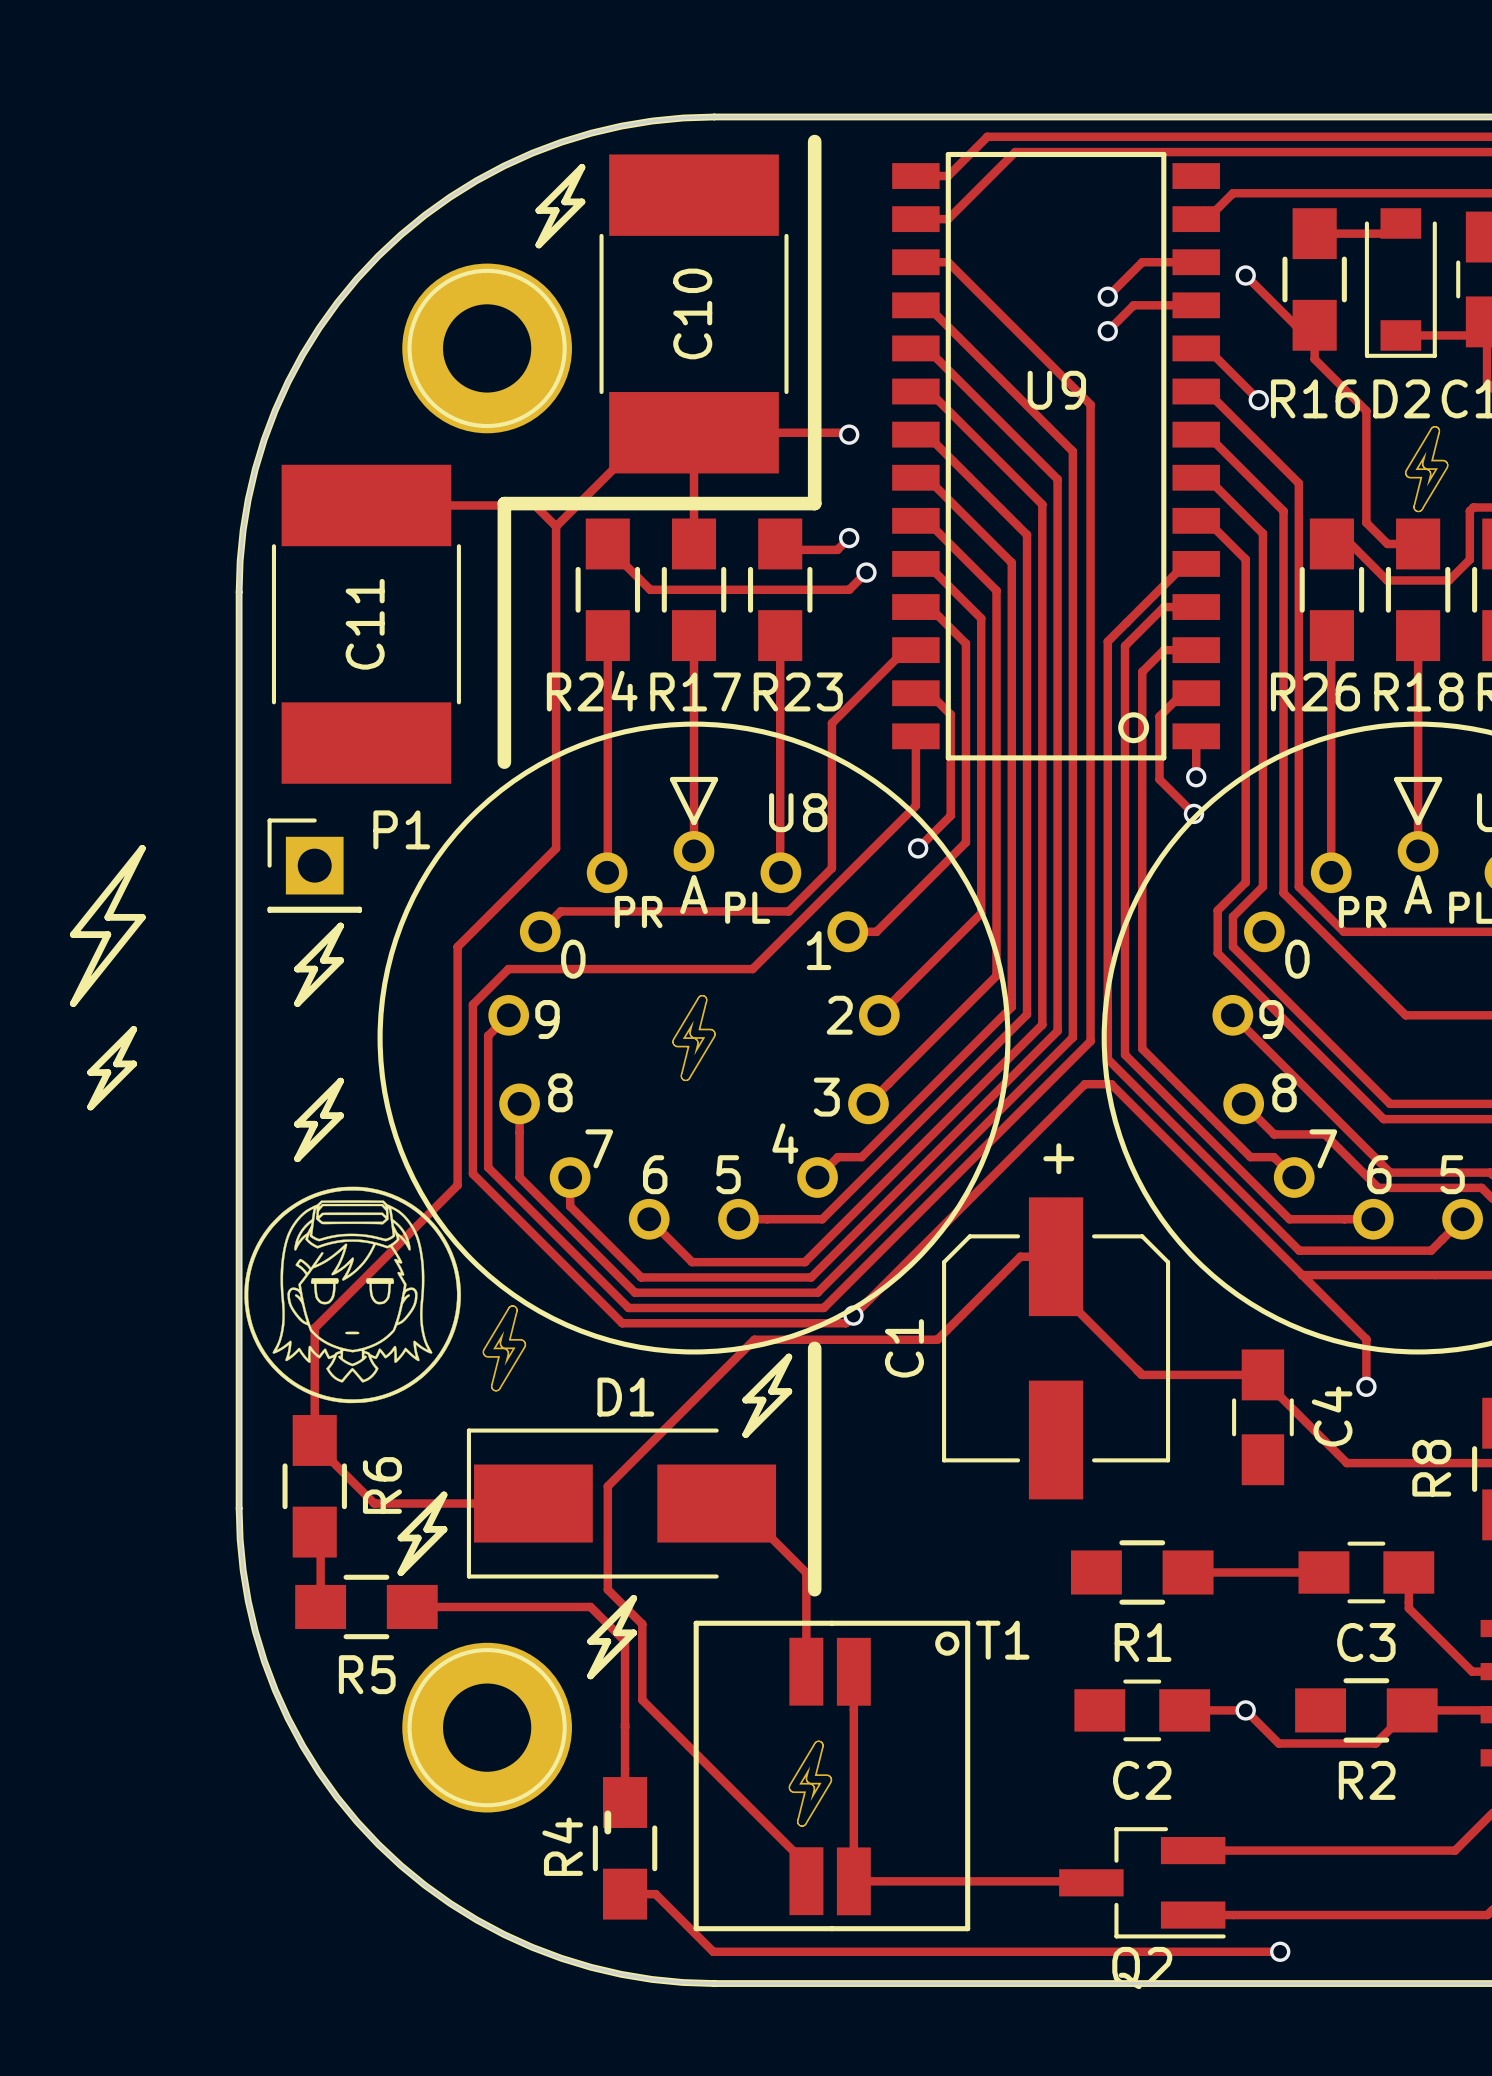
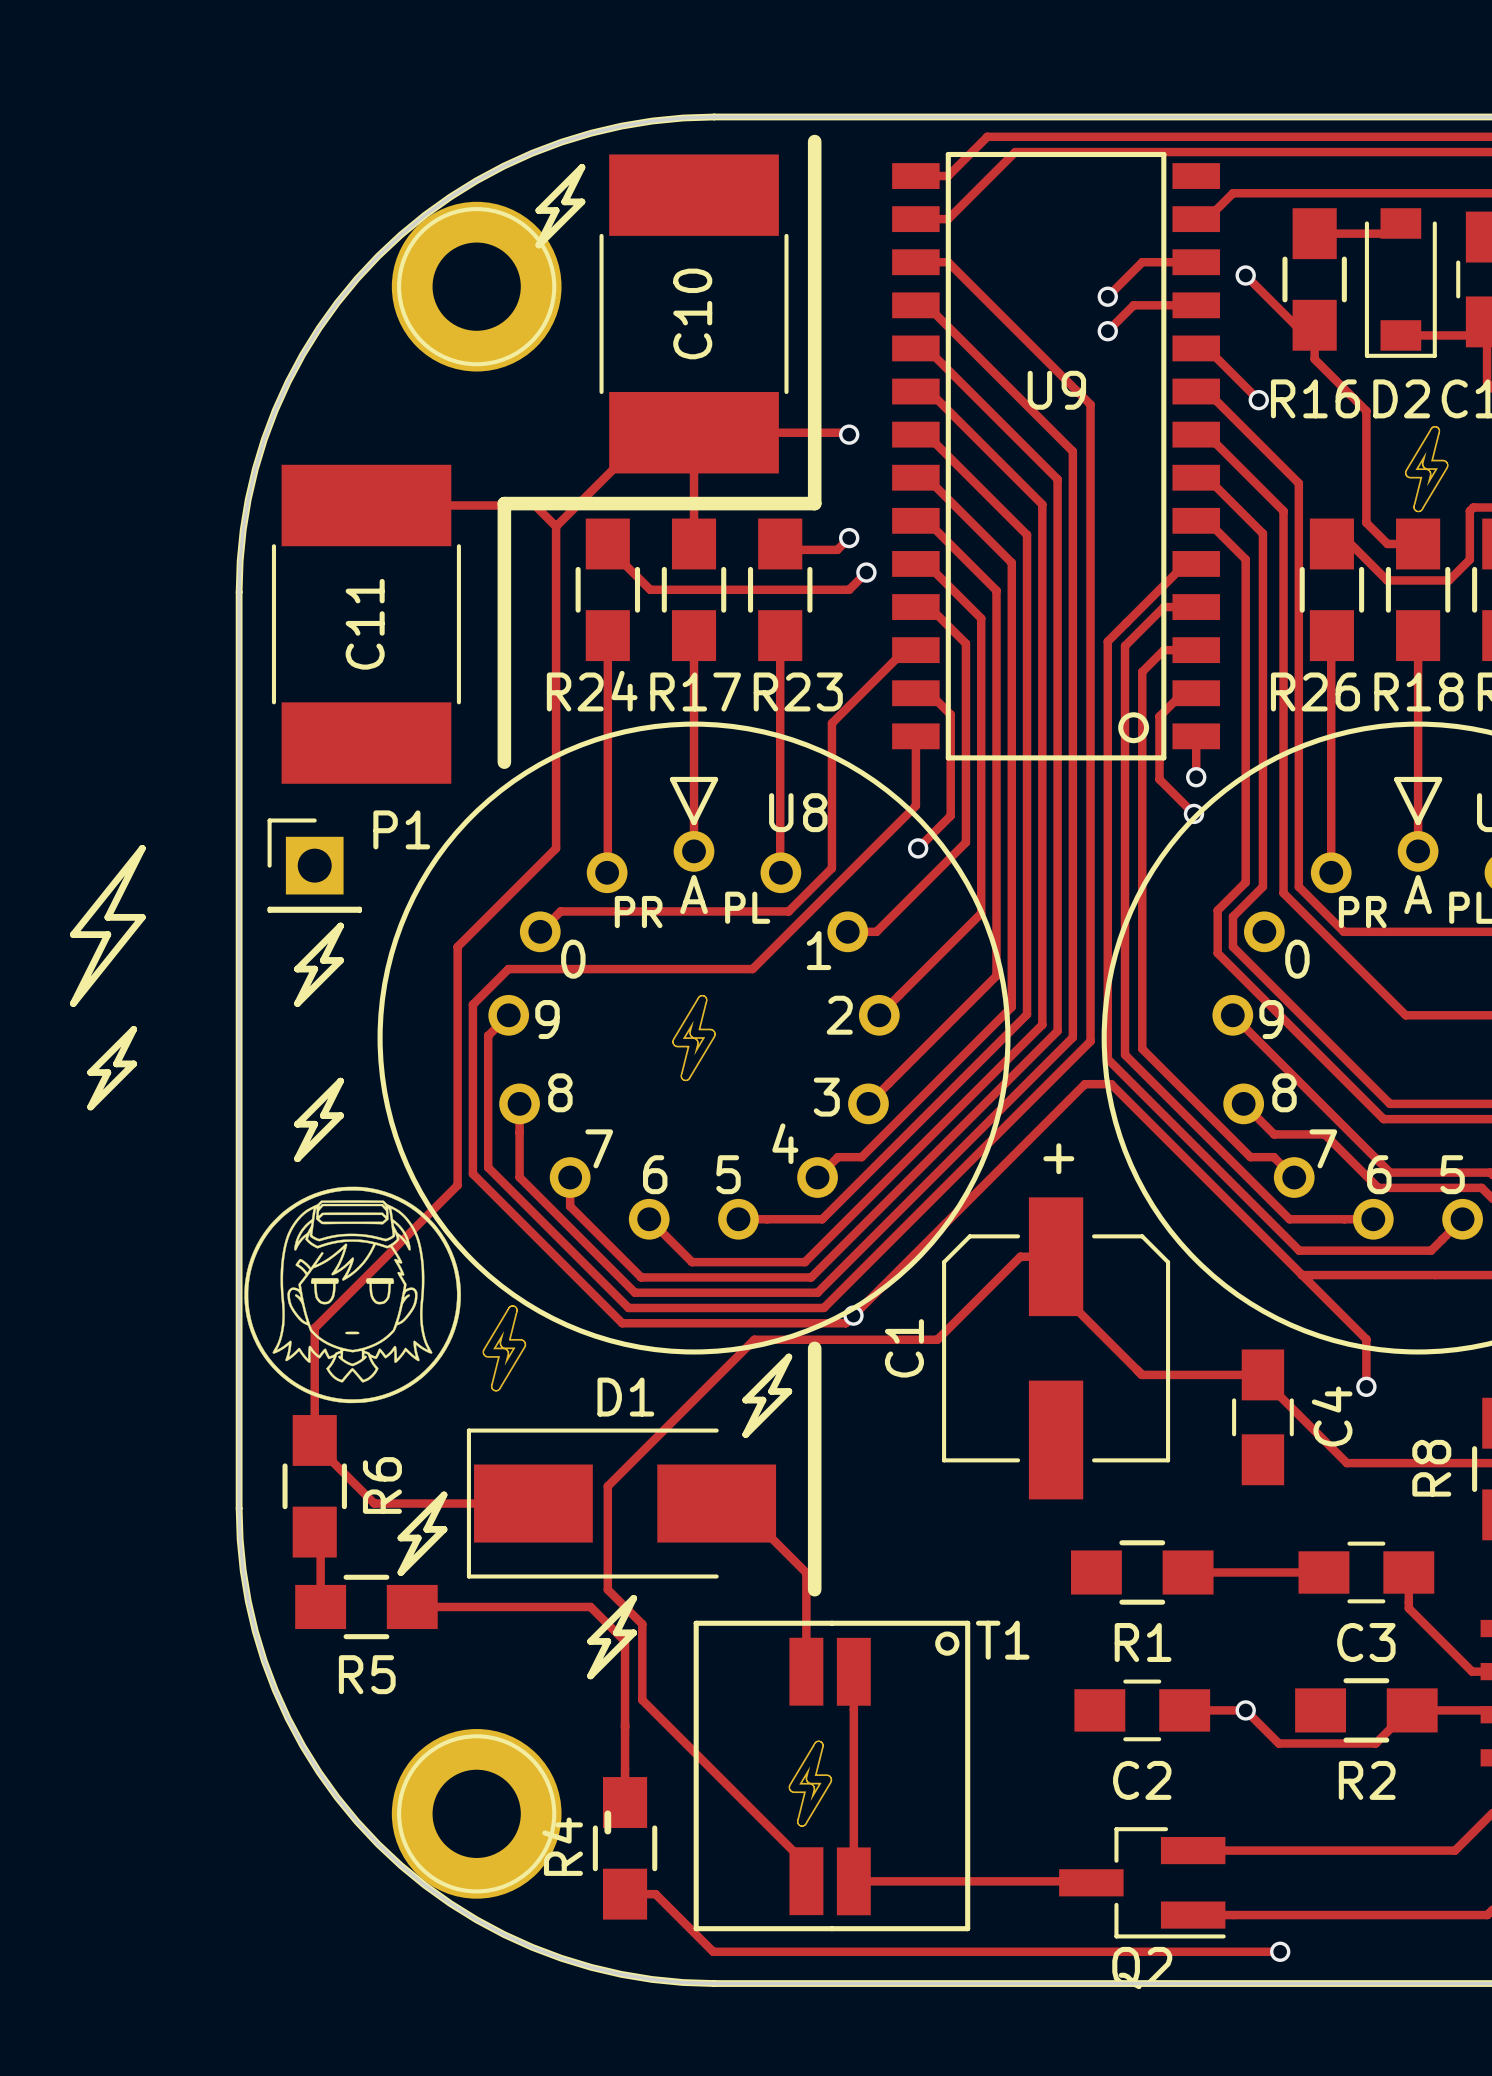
part position: (487, 348) -> (476, 286)
part position: (487, 1727) -> (476, 1813)

